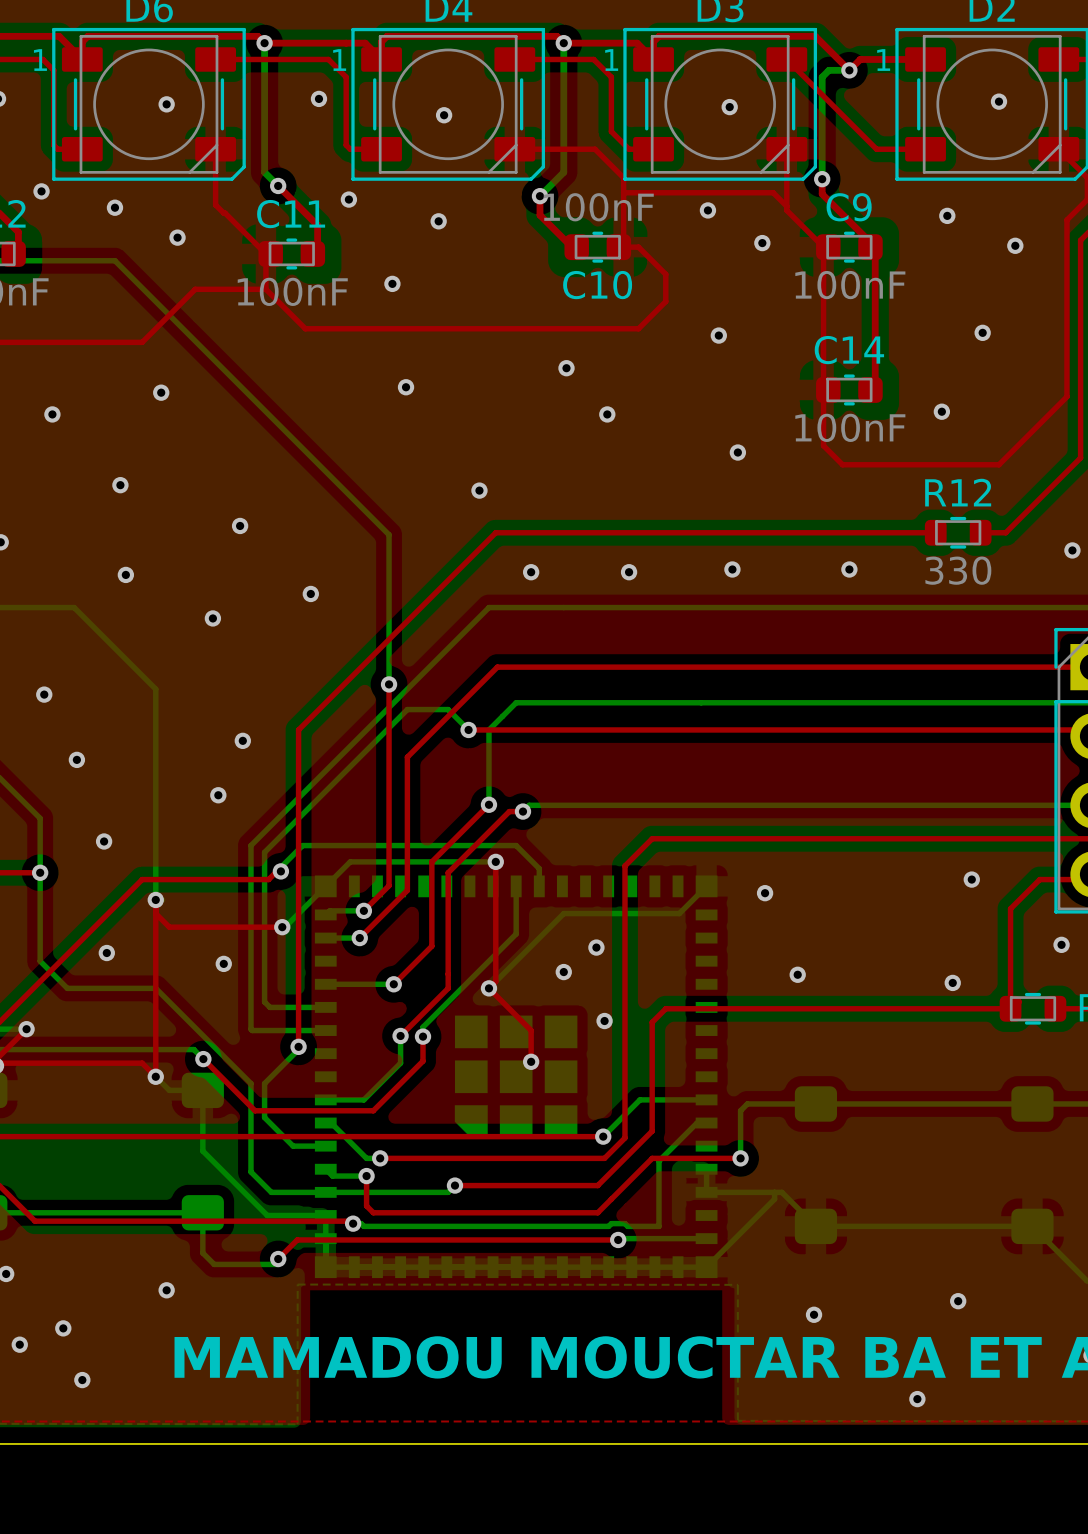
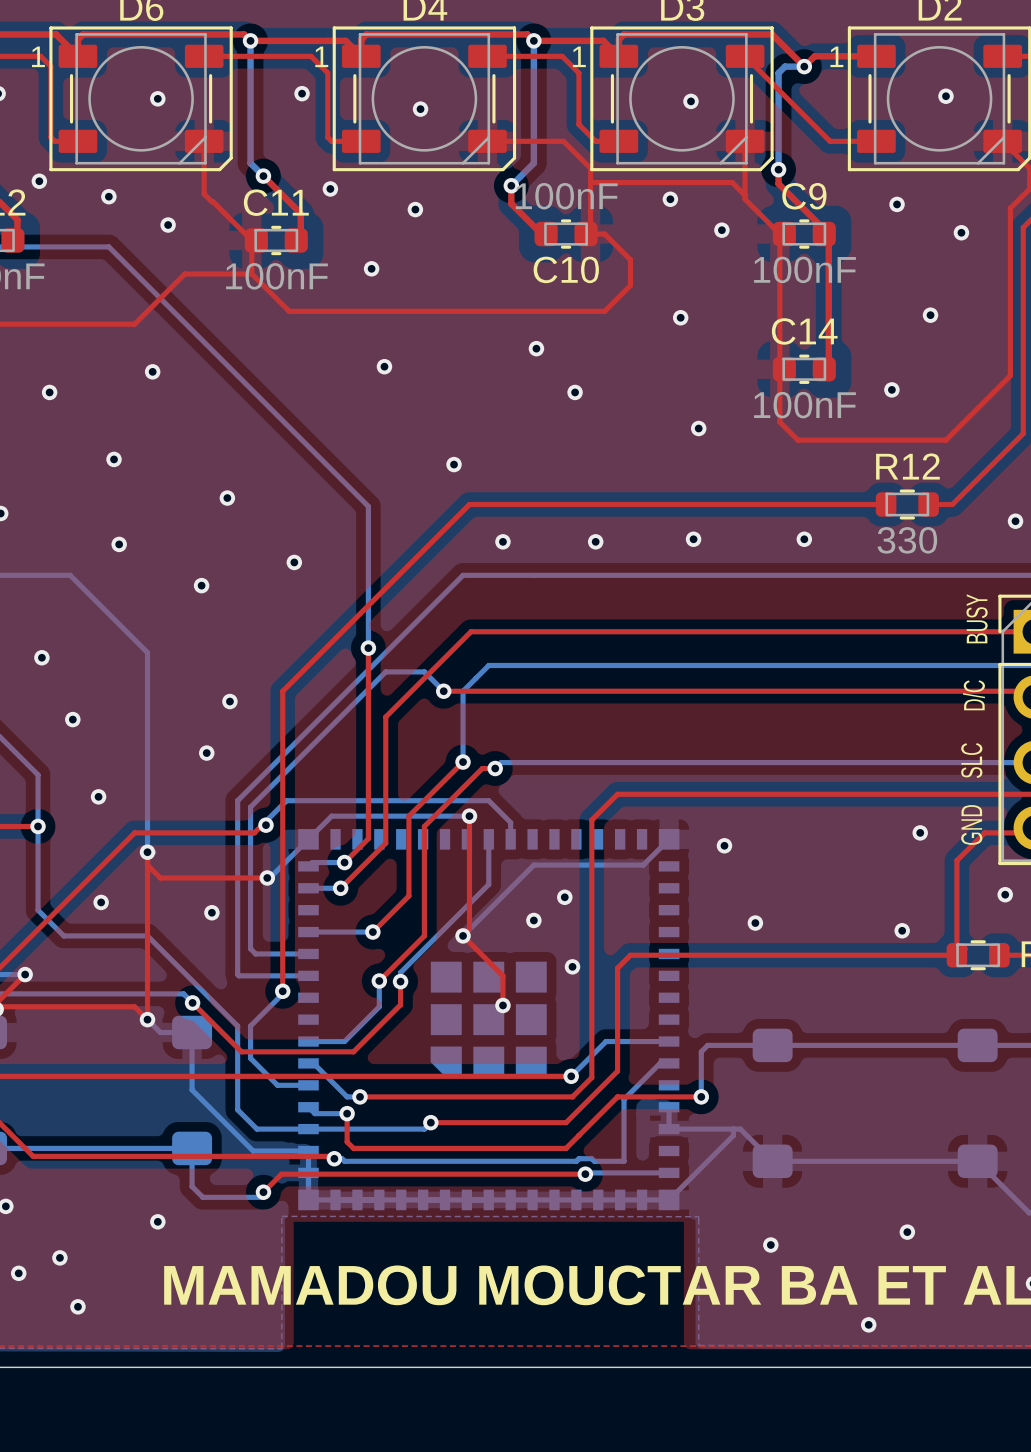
text: none -> BUSY (977, 618)
text: none -> D/C (973, 695)
text: none -> SLC (971, 760)
text: none -> GND (971, 824)

